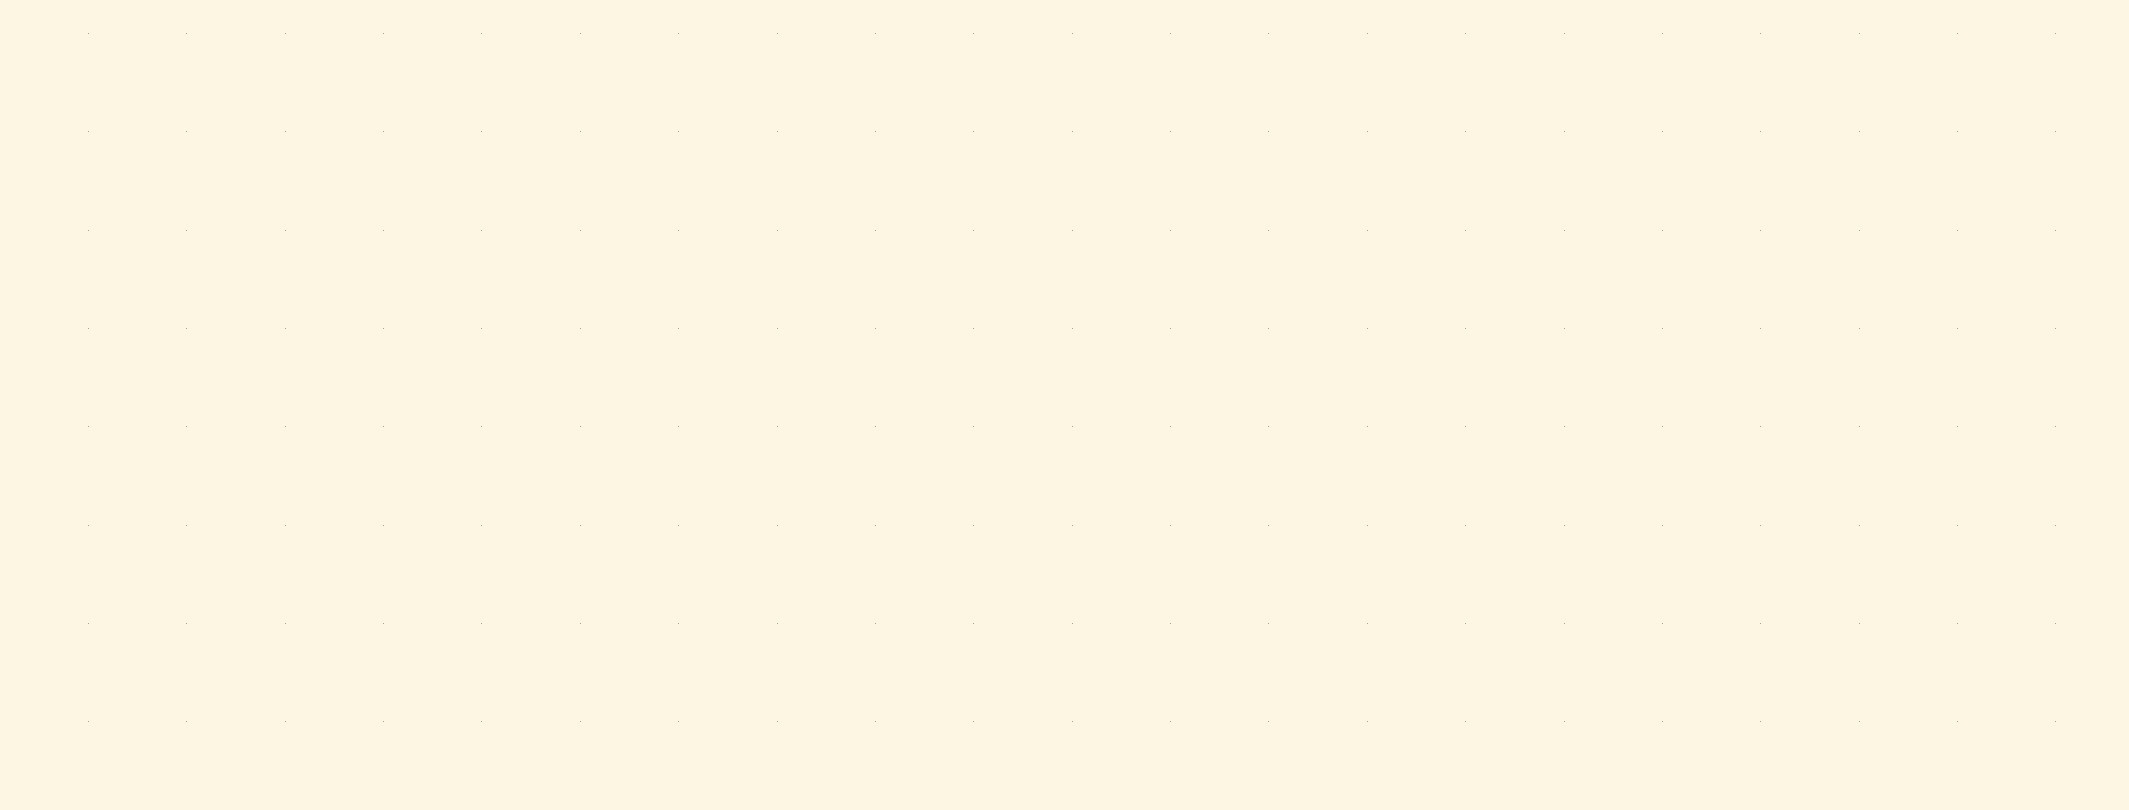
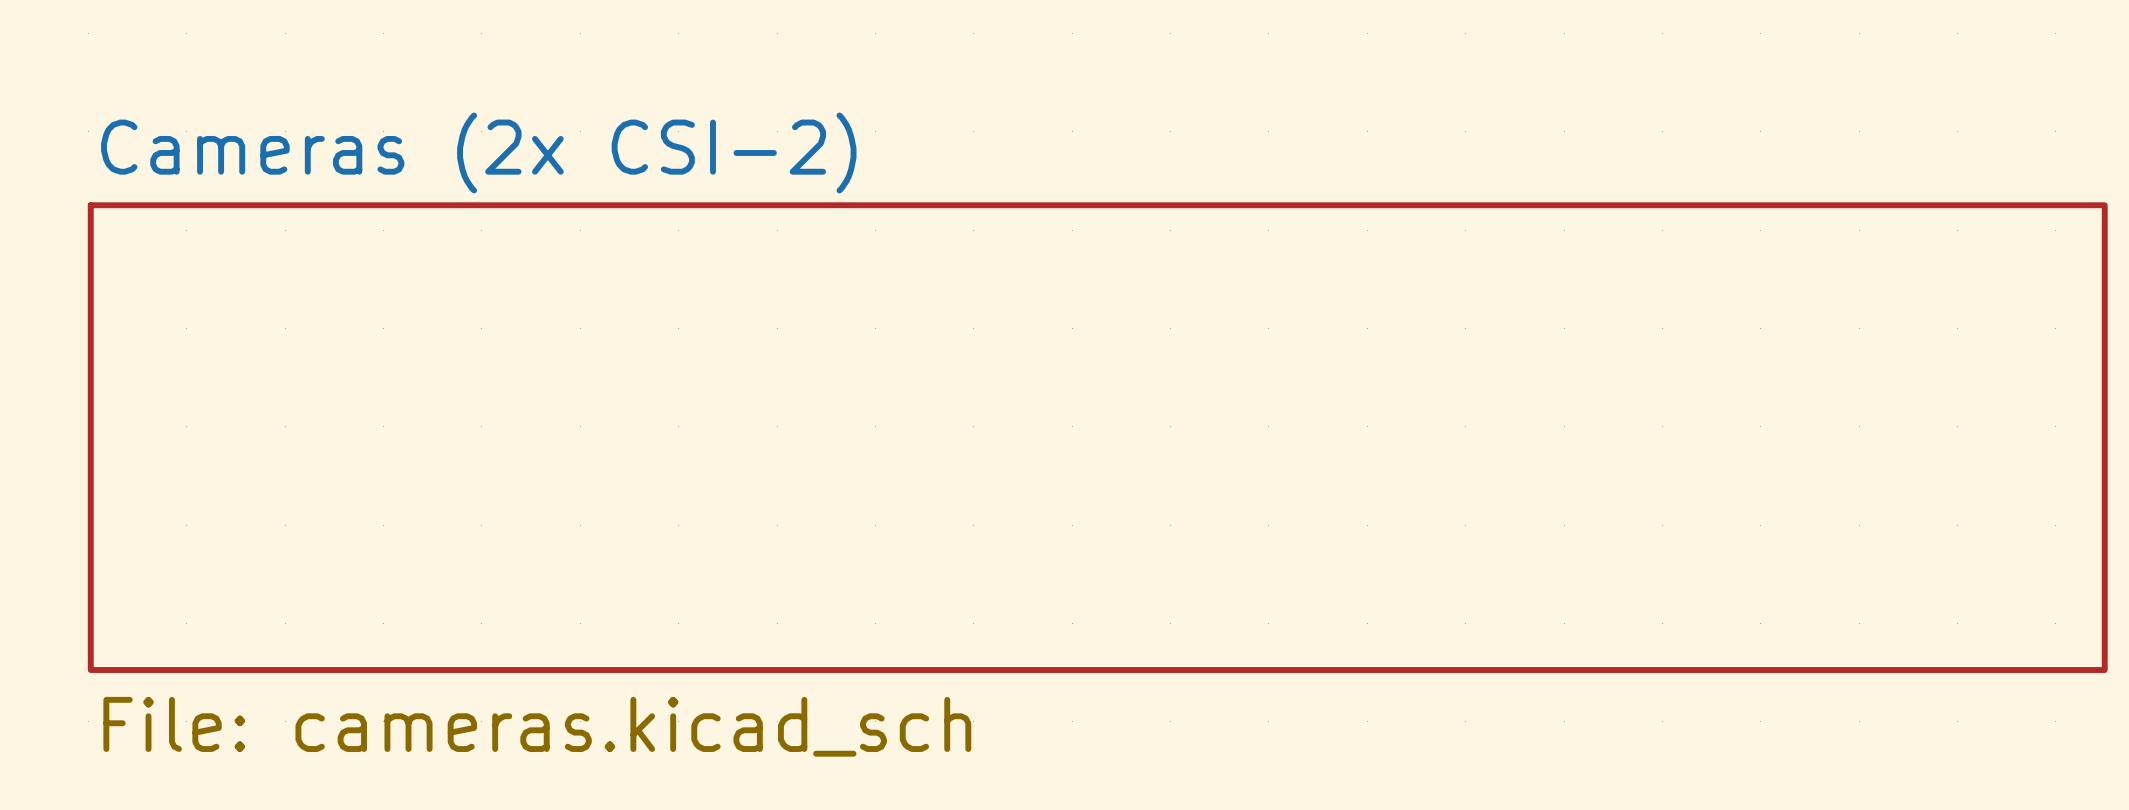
sheet Cameras (2x CSI-2): none -> File: cameras.kicad_sch (1097, 437)

